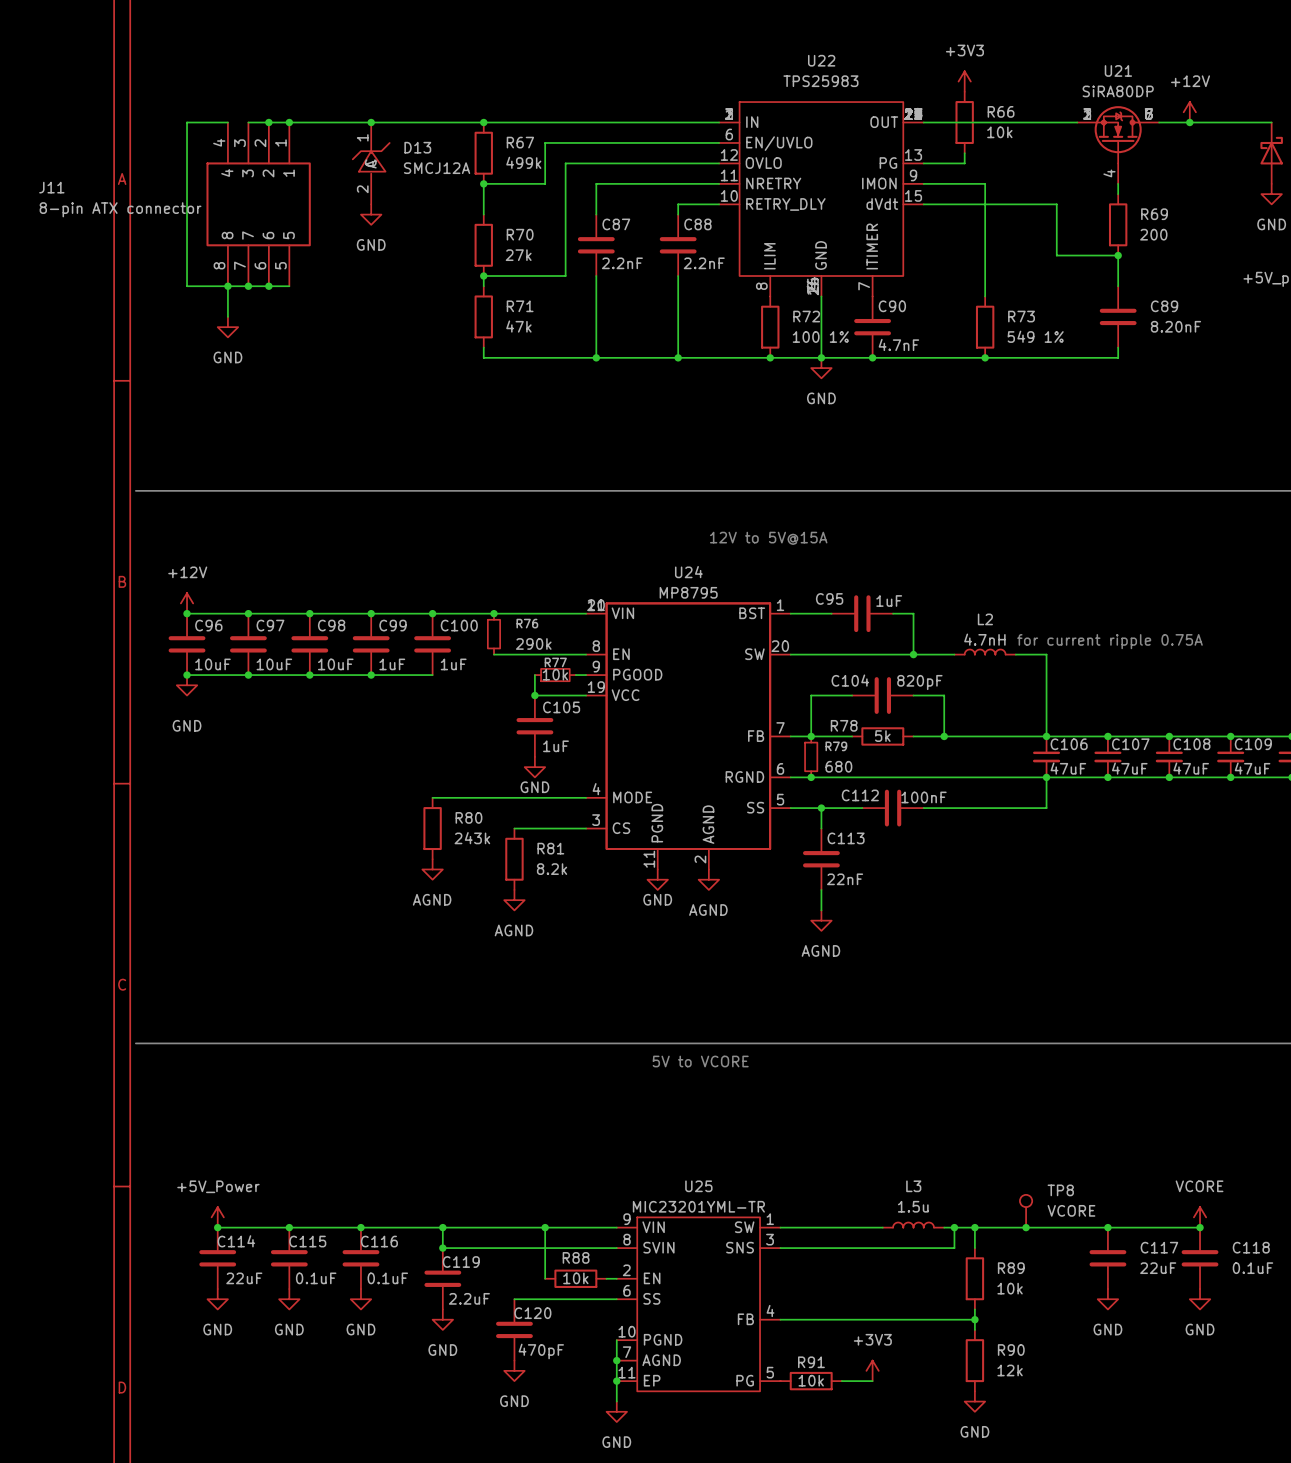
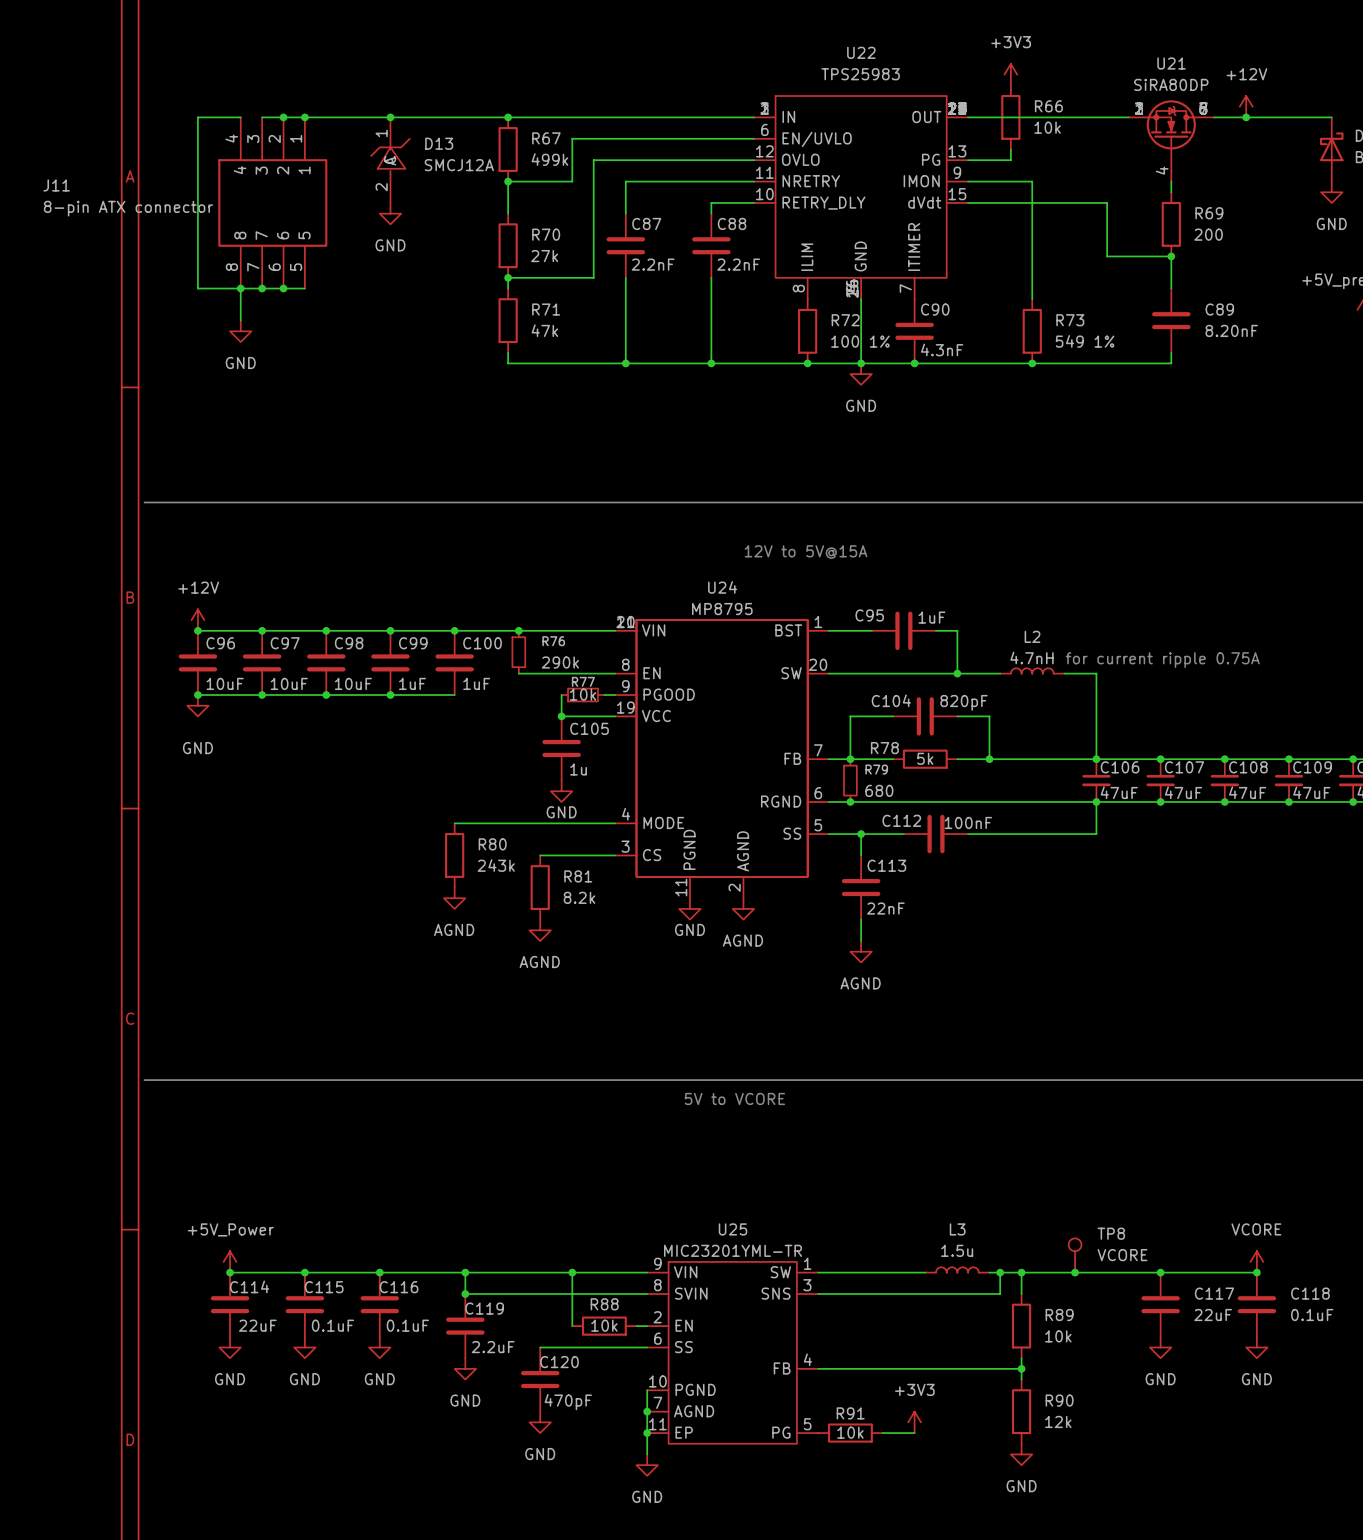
C90 value: 4.7nF (898, 344) -> 4.3nF (942, 349)
C105 value: 1uF (556, 746) -> 1u (578, 769)

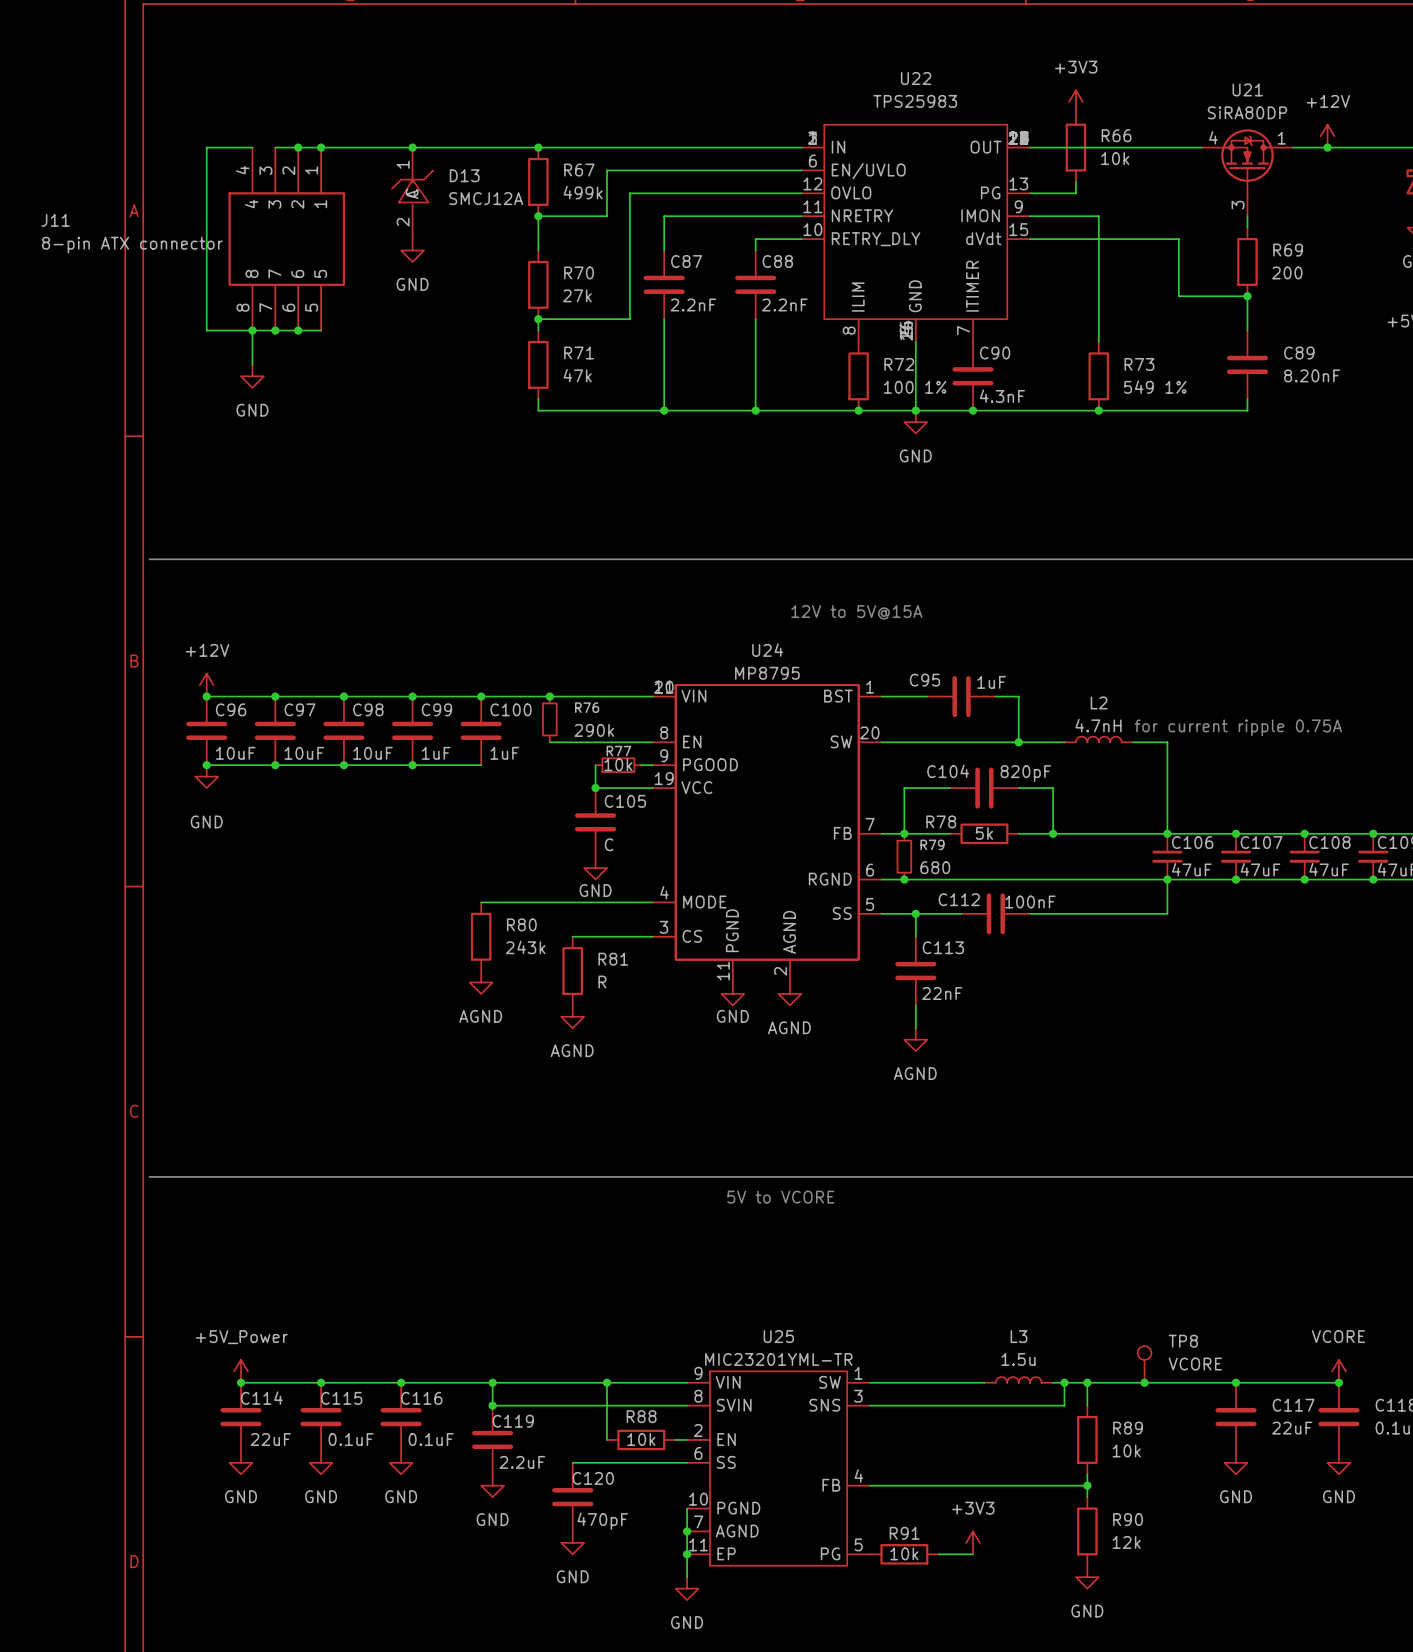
U21 symbol: [1128, 100, 1215, 182] -> [1201, 129, 1294, 217]
C105 value: 1u (578, 769) -> C (609, 844)
R81 value: 8.2k (579, 897) -> R (602, 982)

